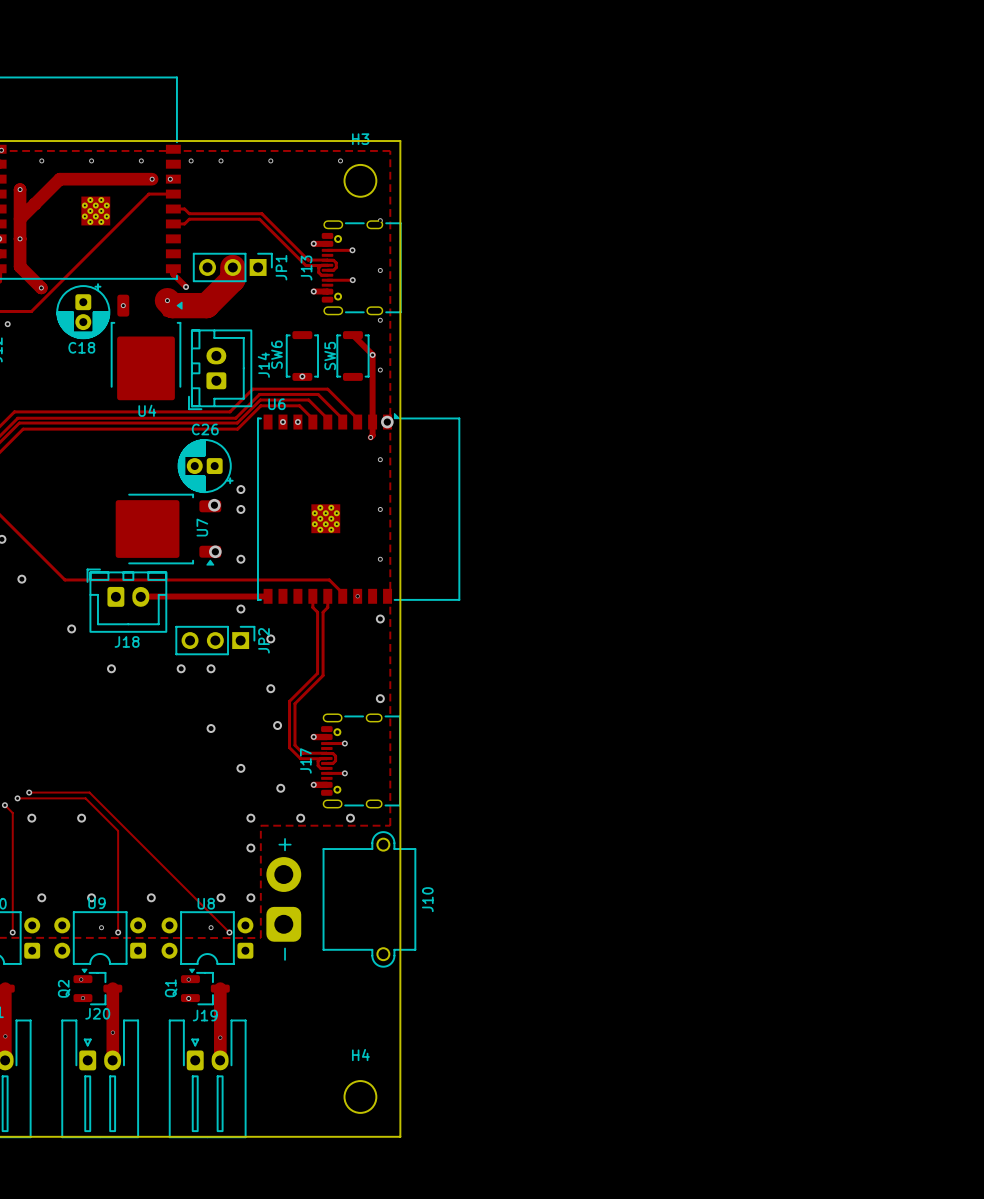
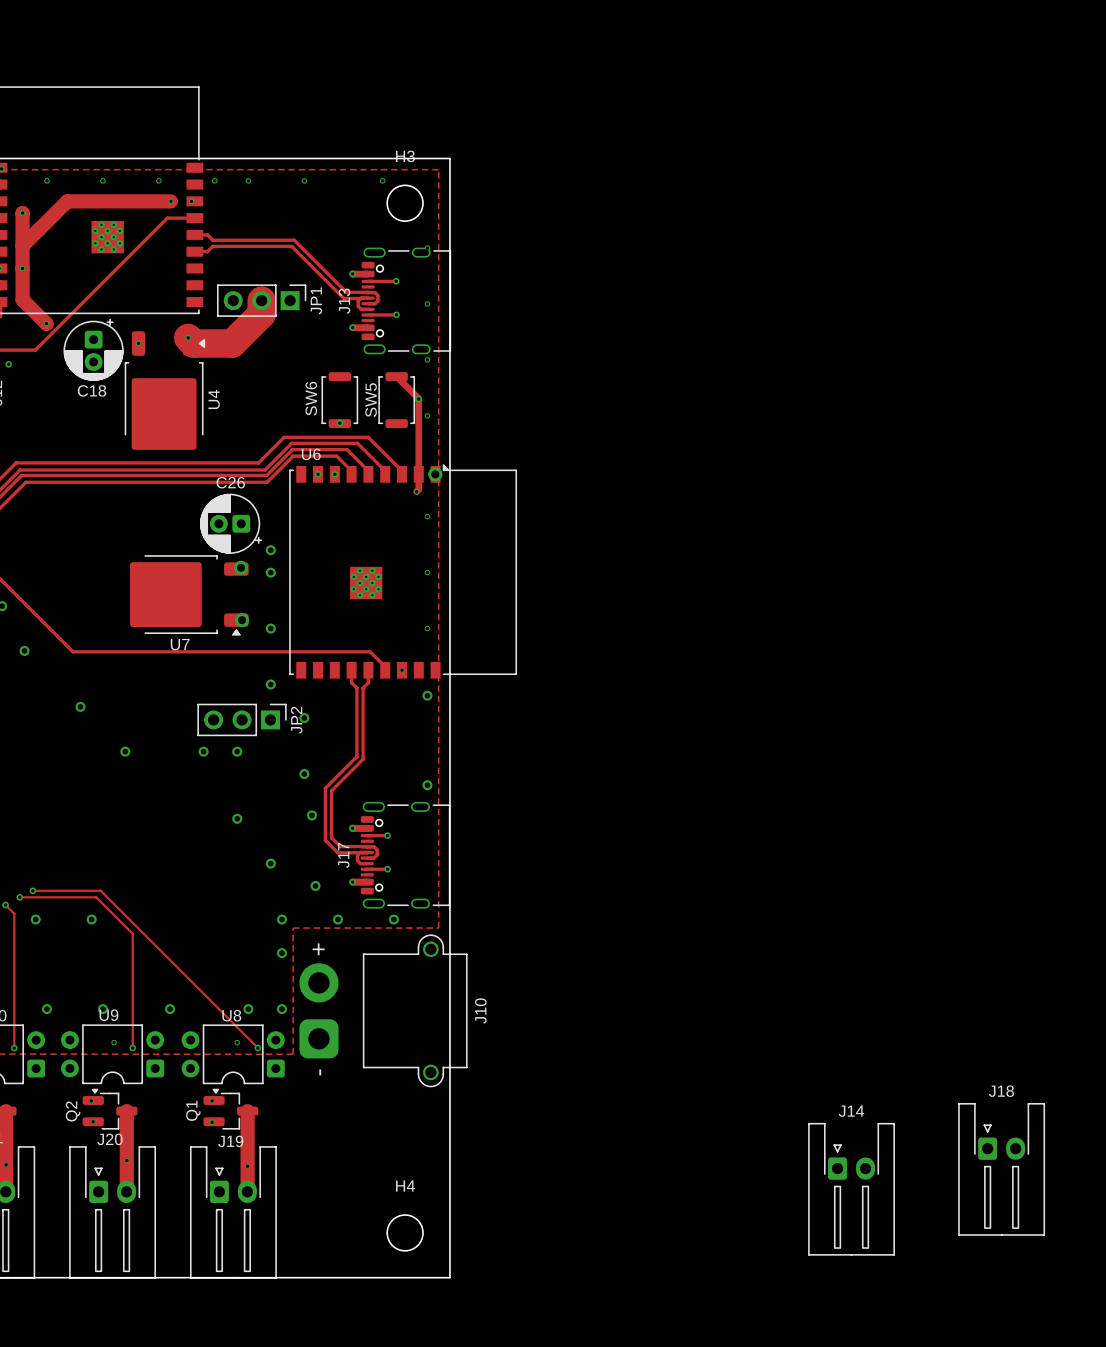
track: (173, 268) (173, 274) (186, 286) -> none
via: (186, 286) -> none
J14 footprint: [188, 329, 252, 410] -> [808, 1123, 895, 1256]
J14 name position: J14 (263, 365) -> J14 (851, 1111)
U4 name rotation: 0° (147, 410) -> 90° counterclockwise (214, 399)
U4 name position: U4 (147, 410) -> U4 (214, 399)
U7 name rotation: 0° (202, 527) -> 90° clockwise (180, 644)
U7 name position: U7 (202, 527) -> U7 (180, 644)
J18 footprint: [86, 568, 167, 633] -> [958, 1103, 1045, 1236]
track: (139, 594) (141, 596) (268, 596) -> none
J18 name position: J18 (127, 641) -> J18 (1001, 1091)

